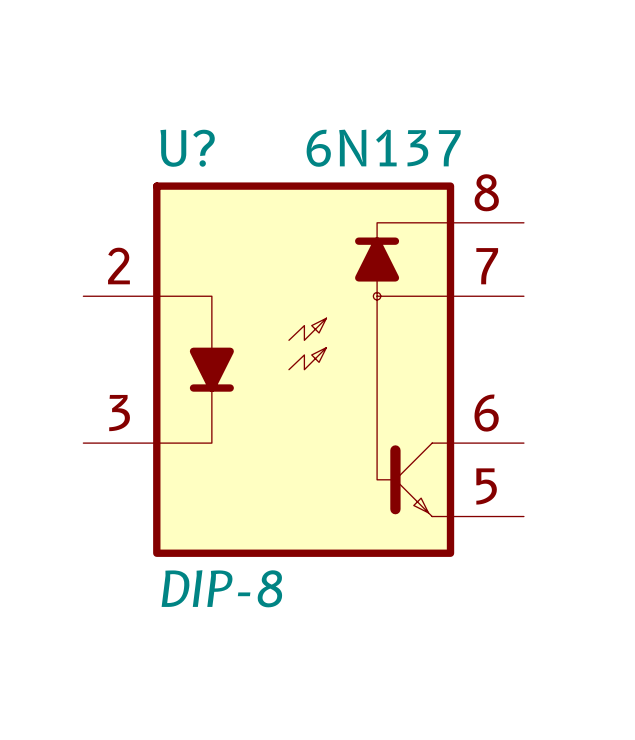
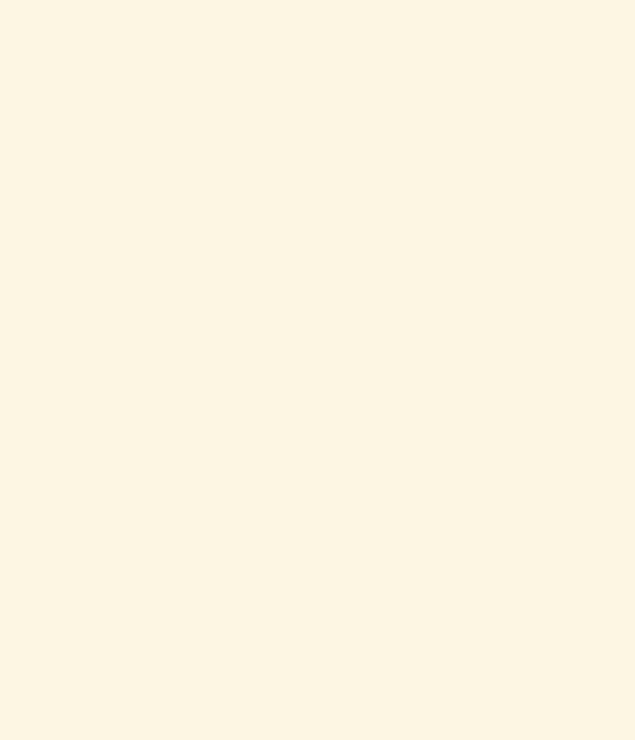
U?: 6N137 (303, 369) -> none

